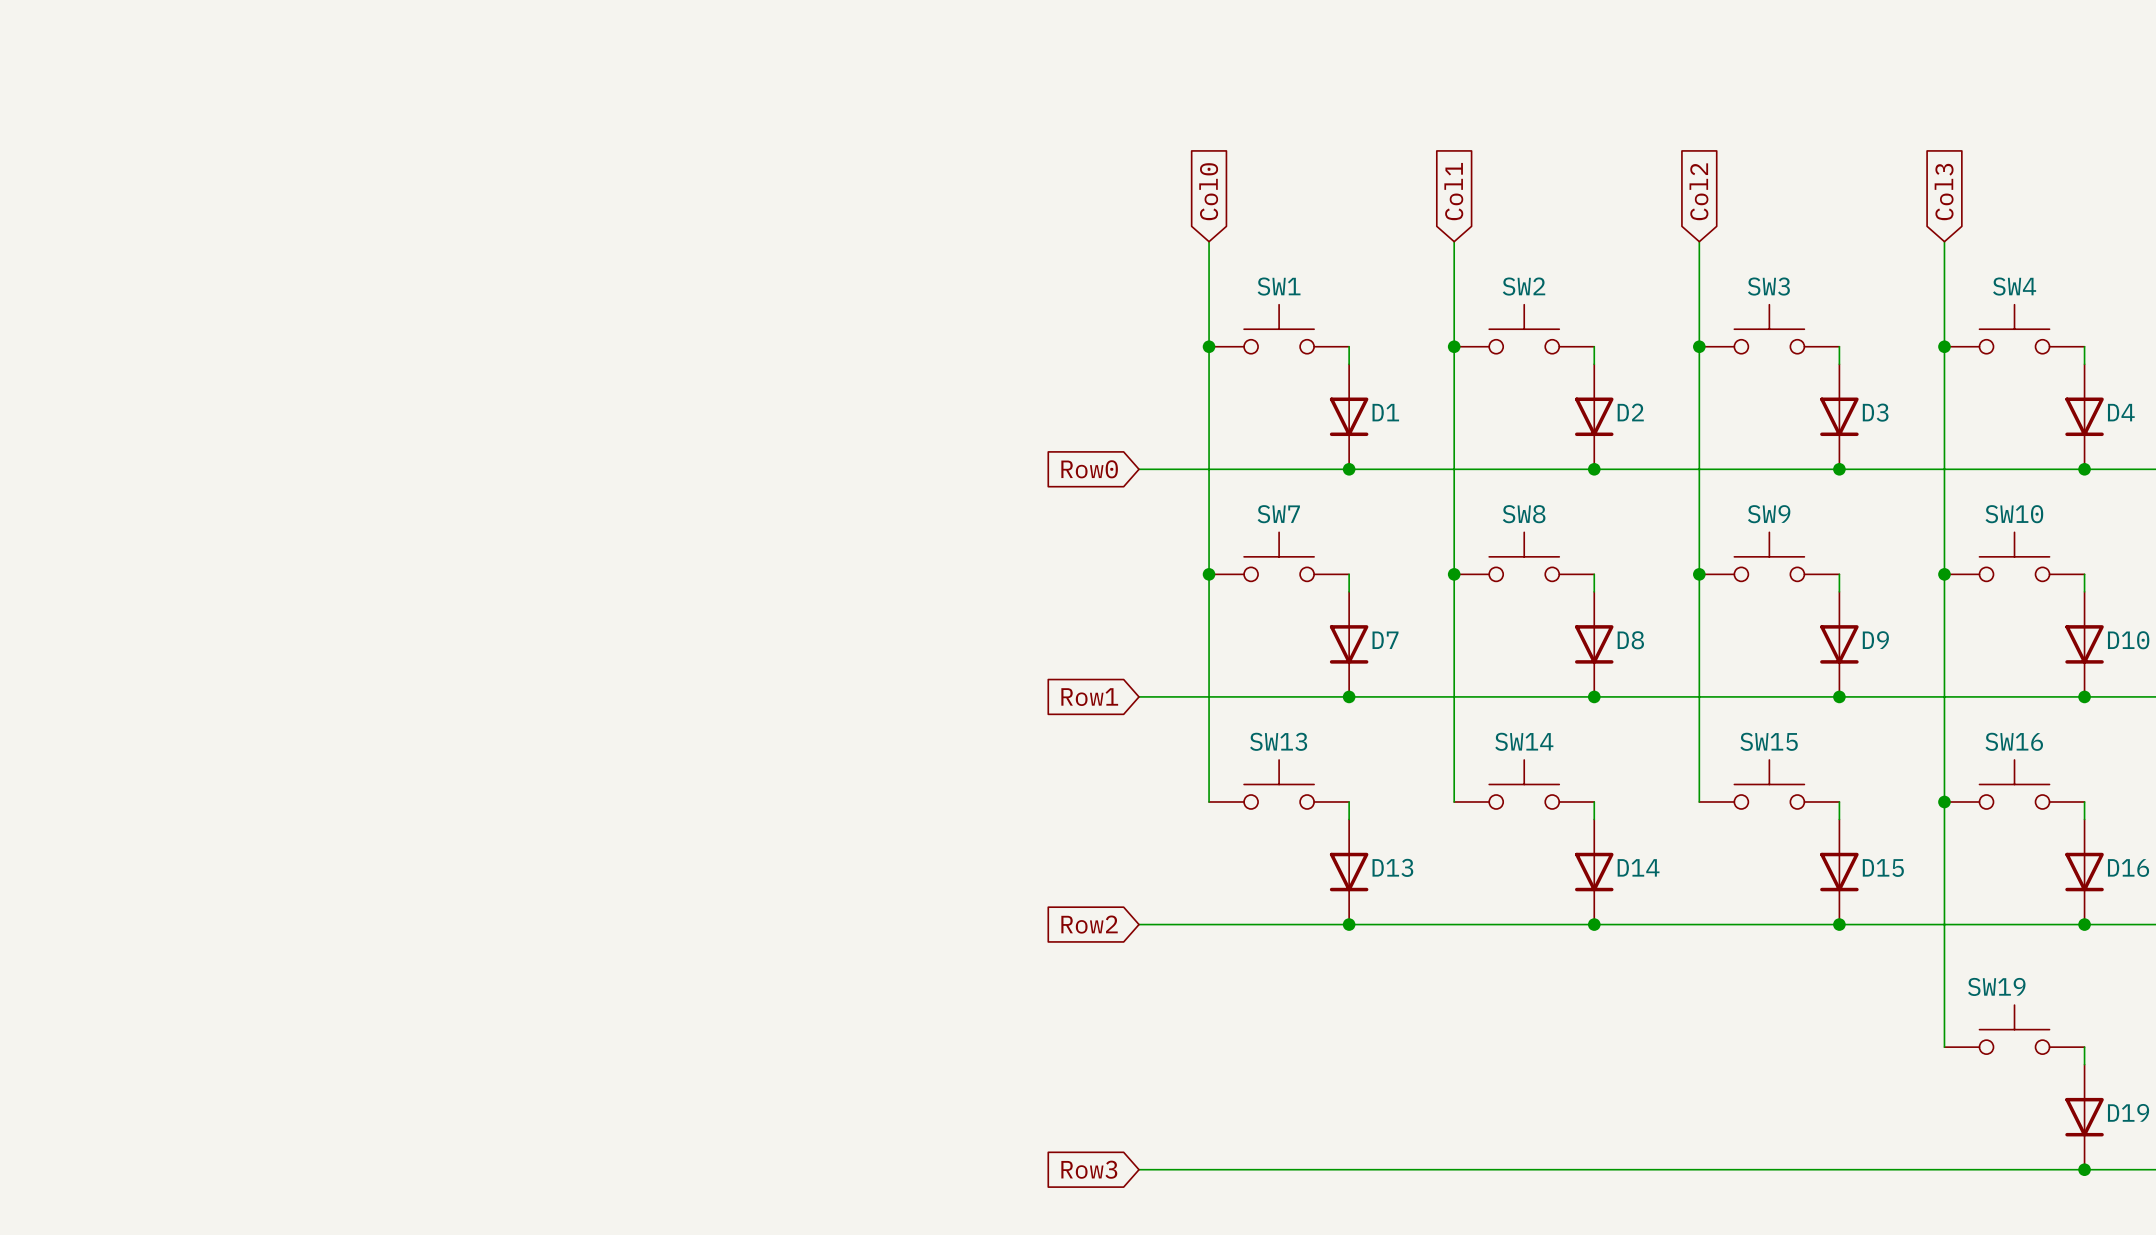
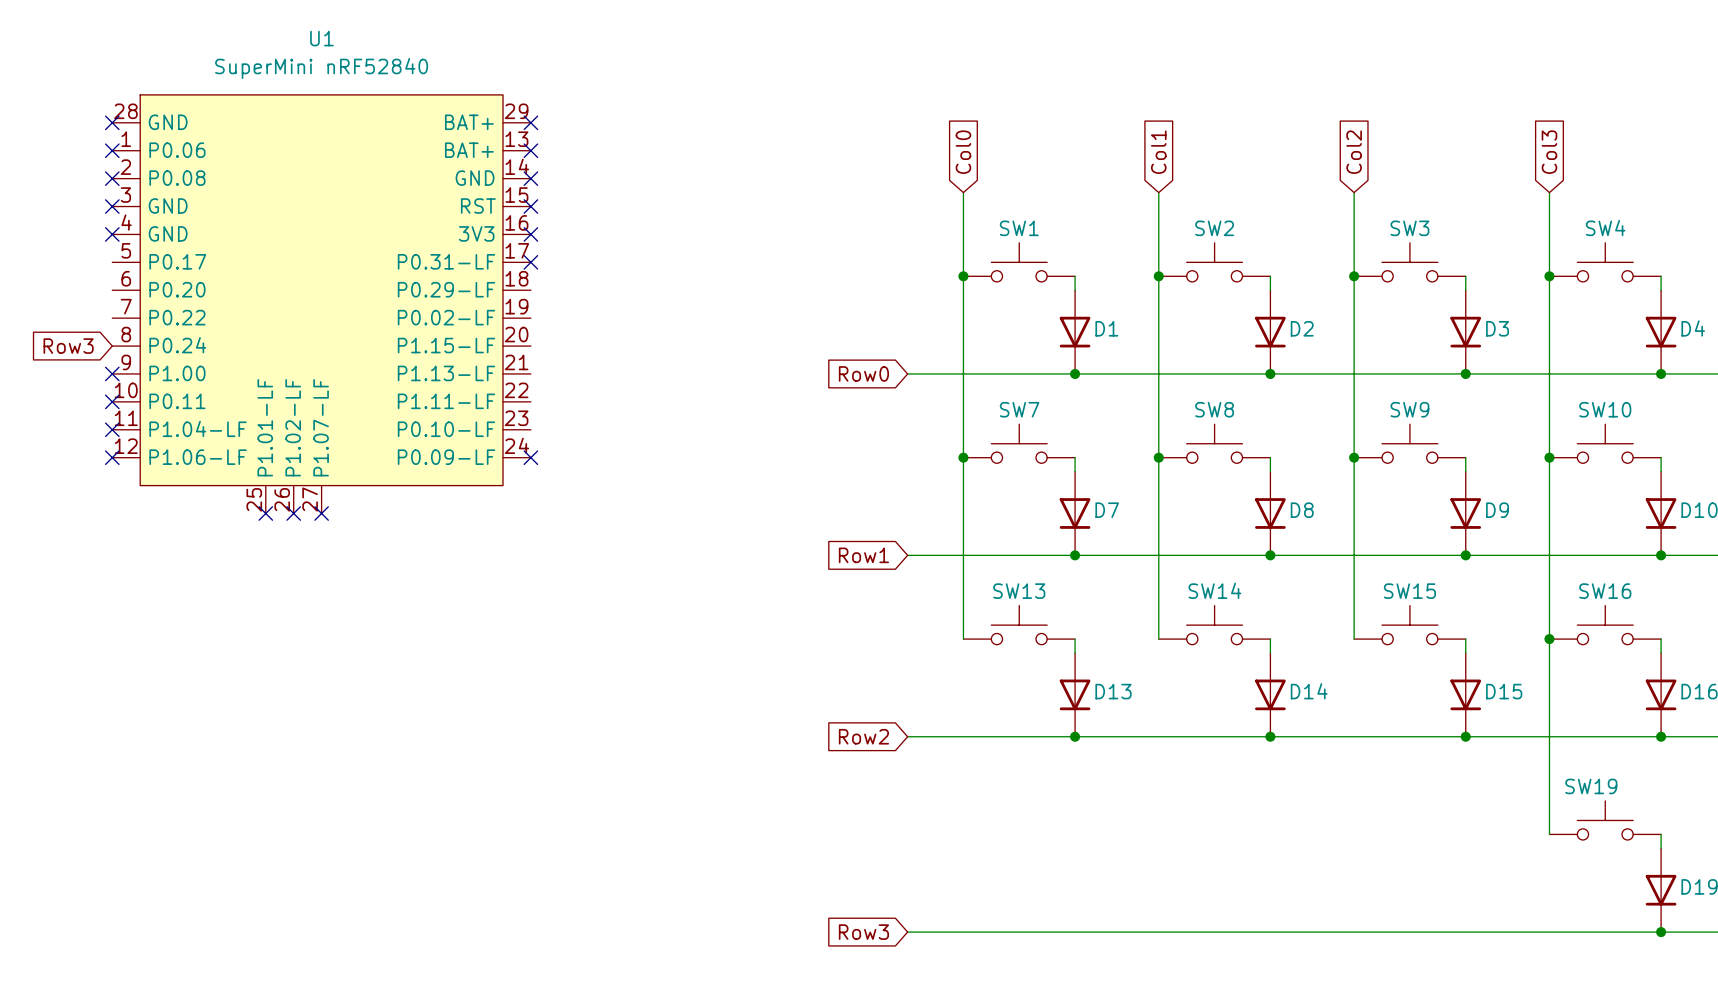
no-connect mark: none -> (112, 122)
no-connect mark: none -> (530, 122)
no-connect mark: none -> (112, 150)
no-connect mark: none -> (530, 150)
no-connect mark: none -> (112, 178)
no-connect mark: none -> (530, 178)
no-connect mark: none -> (112, 206)
no-connect mark: none -> (530, 206)
no-connect mark: none -> (112, 234)
no-connect mark: none -> (530, 234)
no-connect mark: none -> (530, 262)
U1: none -> SuperMini nRF52840 (321, 304)
global label: none -> Row3 (68, 346)
no-connect mark: none -> (112, 373)
no-connect mark: none -> (112, 401)
no-connect mark: none -> (112, 429)
no-connect mark: none -> (112, 457)
no-connect mark: none -> (530, 457)
no-connect mark: none -> (265, 513)
no-connect mark: none -> (293, 513)
no-connect mark: none -> (321, 513)

